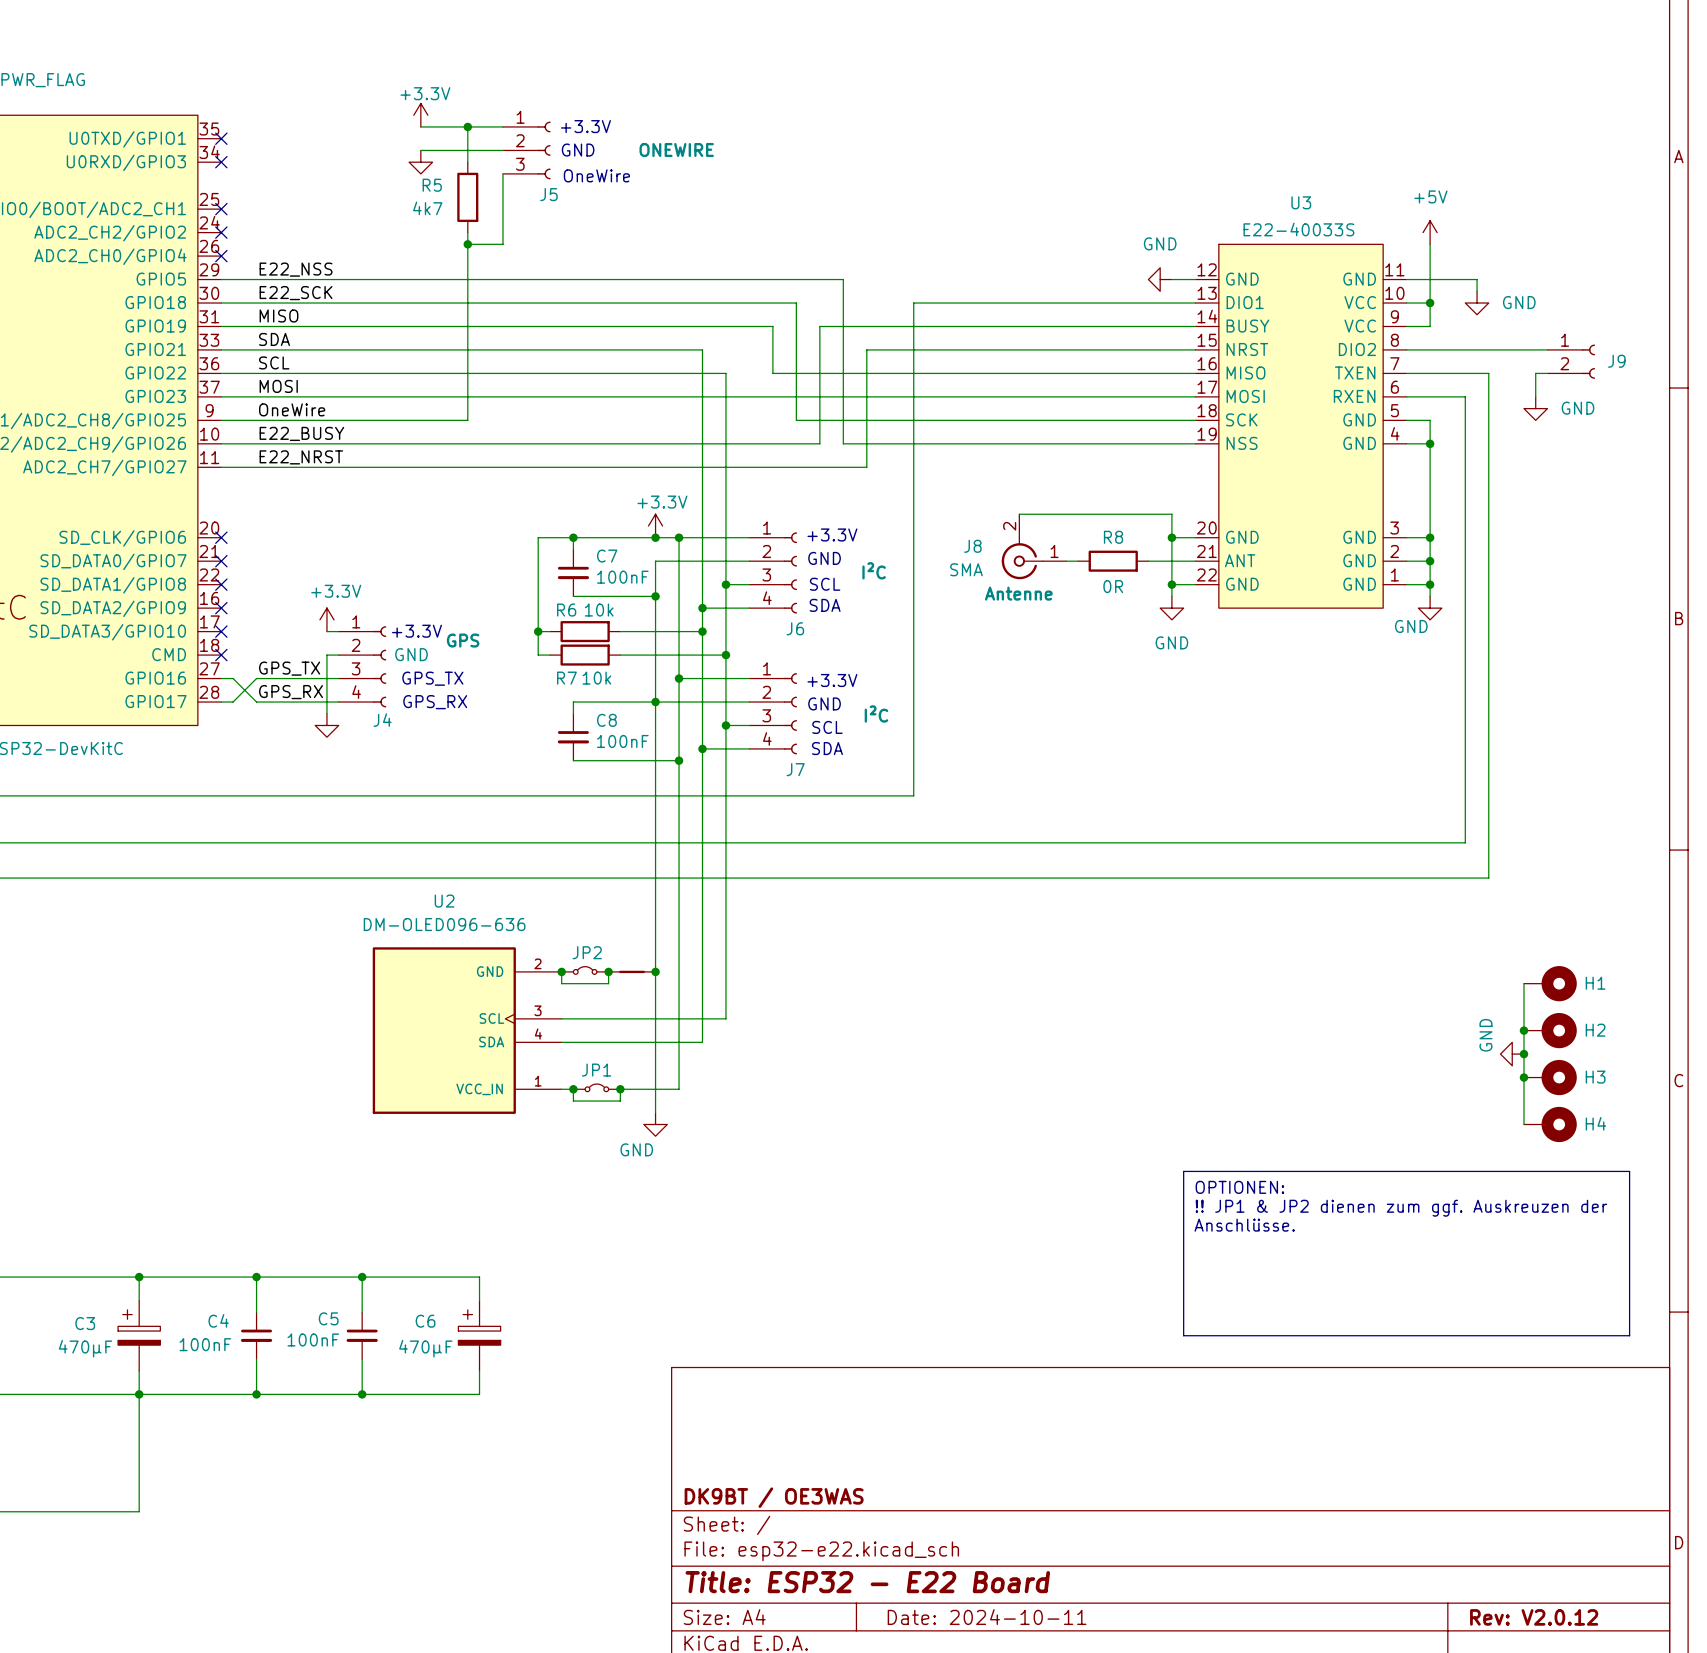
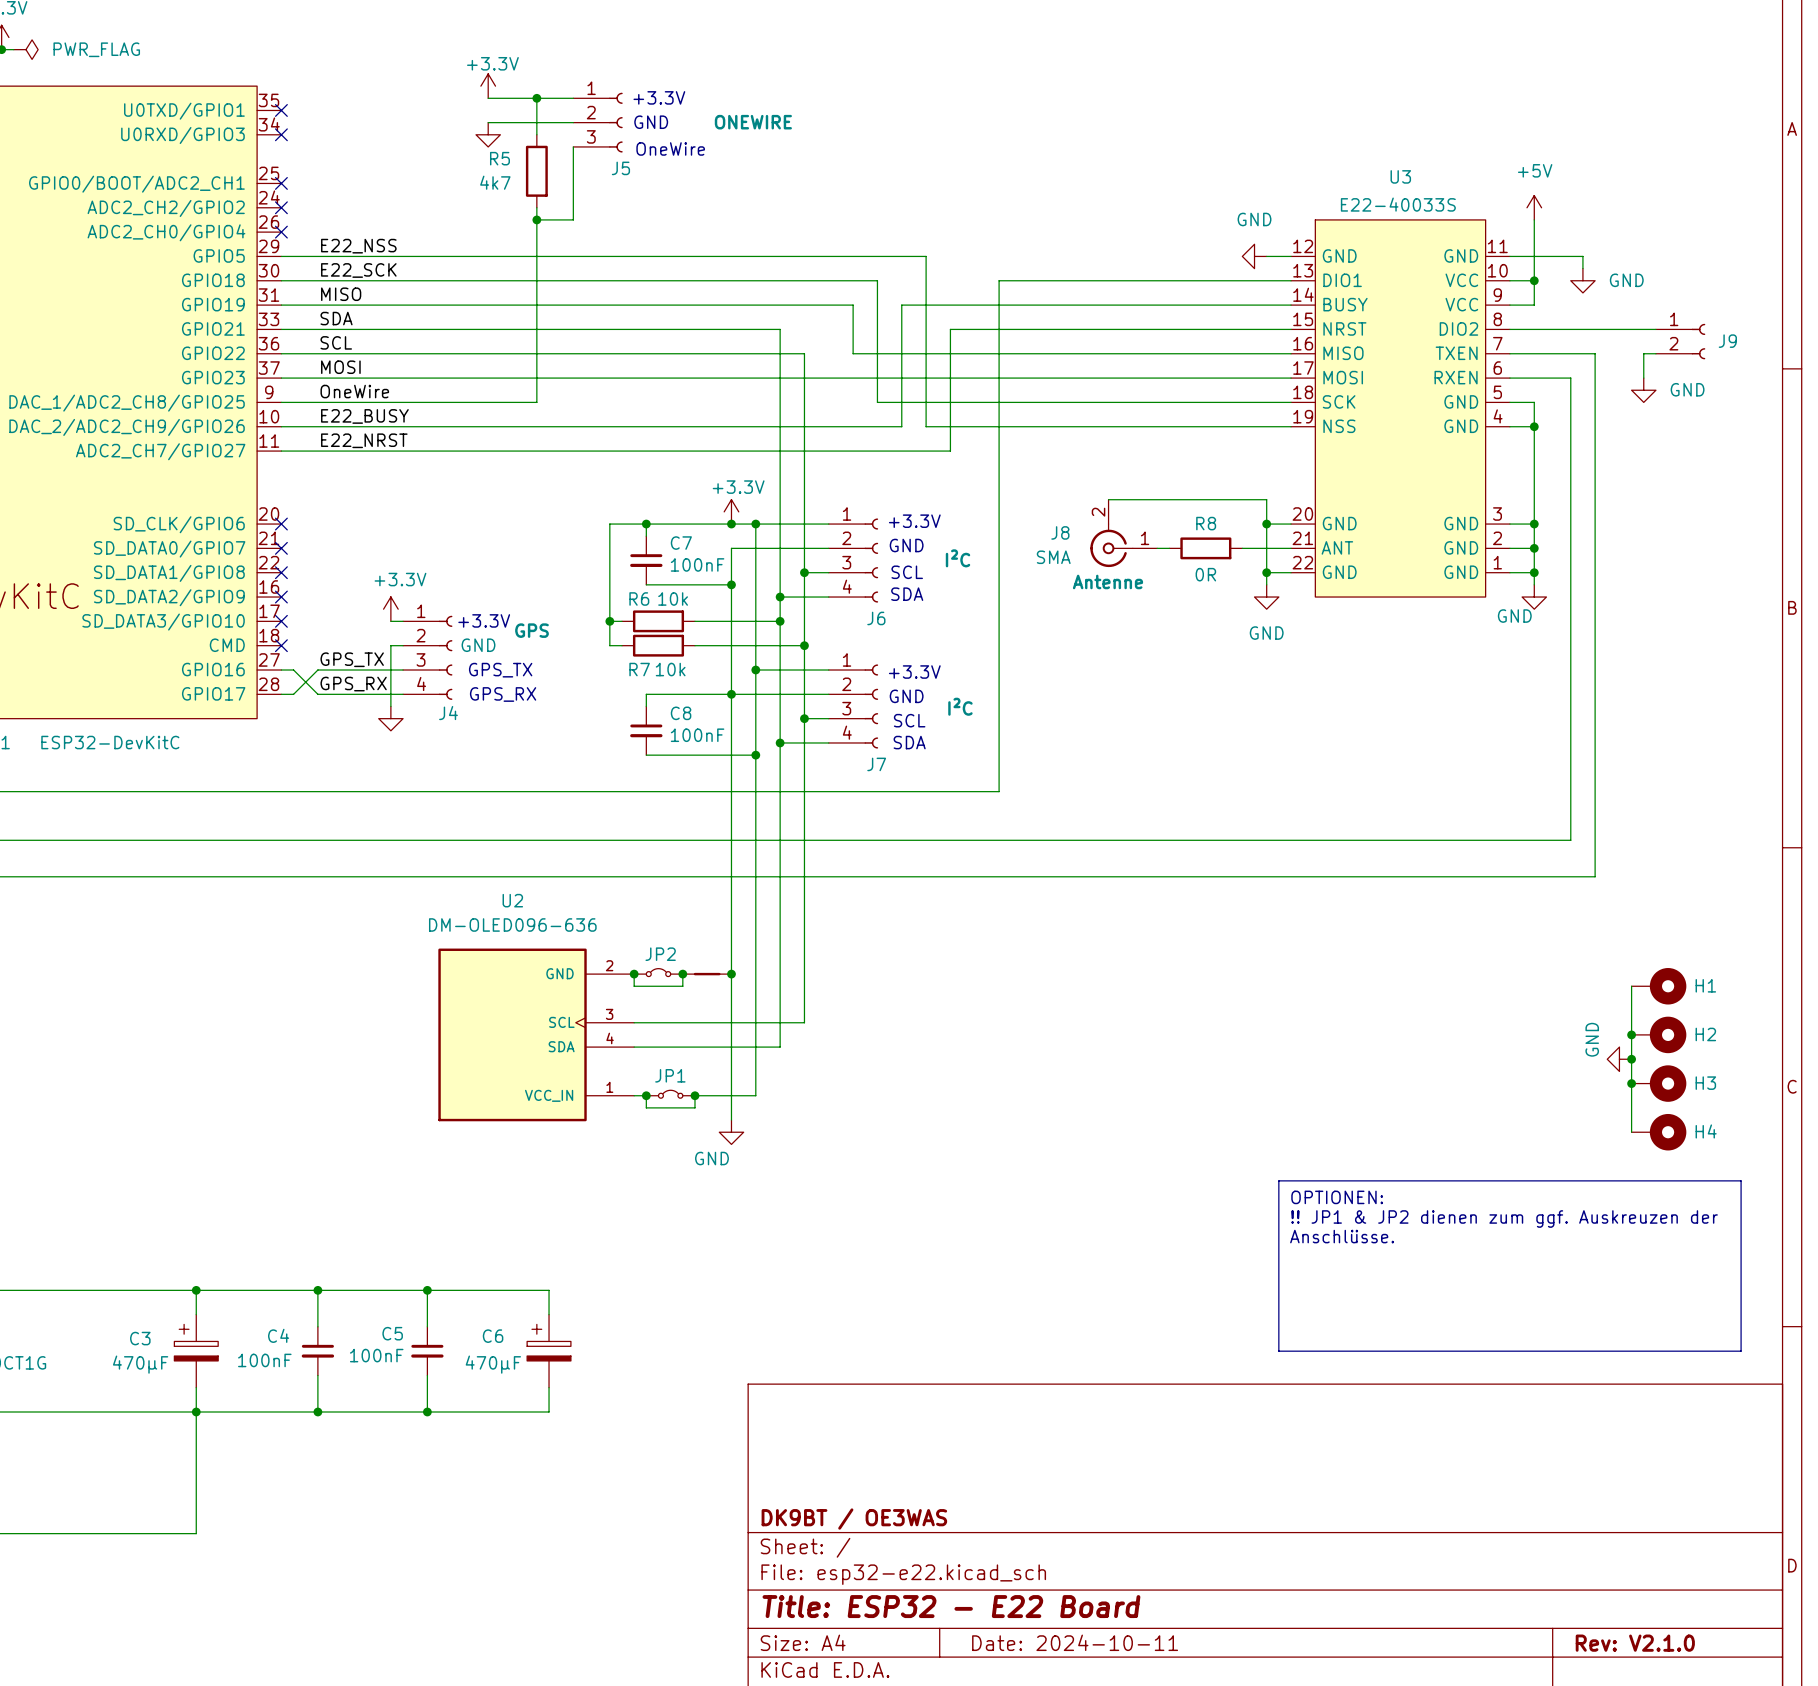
title block: Rev: V2.0.12 (1534, 1617) -> Rev: V2.1.0 (1635, 1643)

